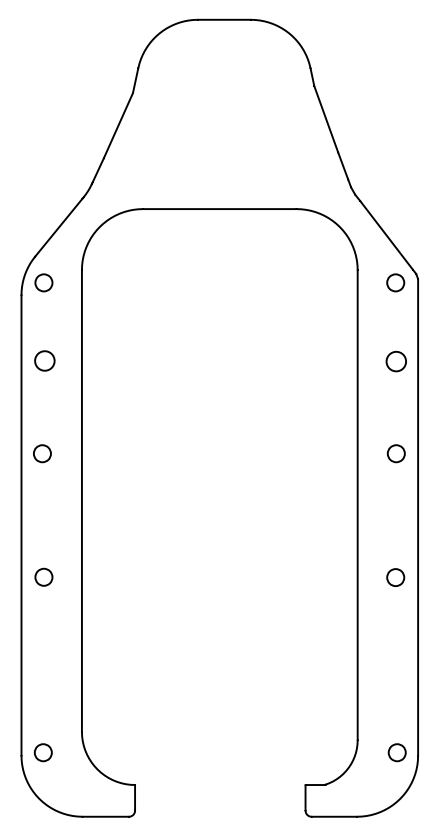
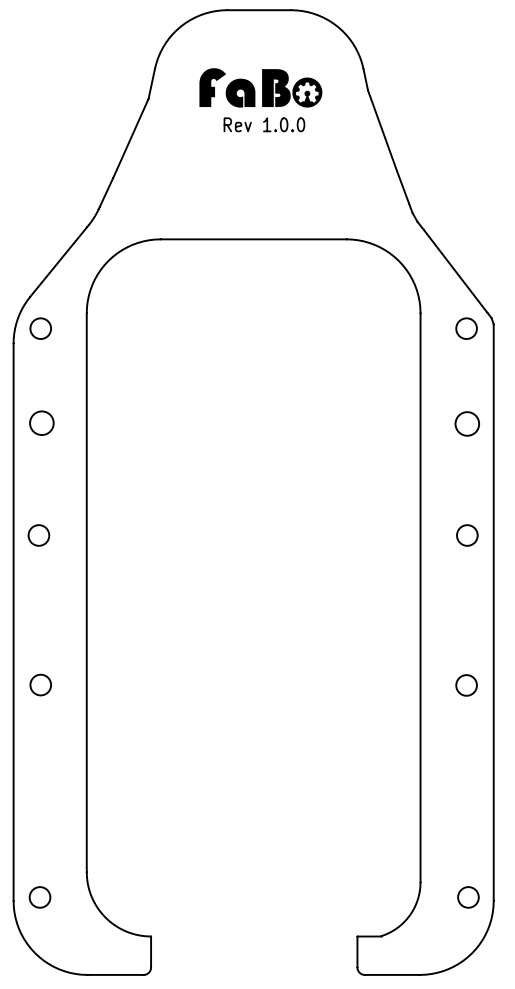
drawing: none -> [199, 68, 323, 108]
text: none -> Rev 1.0.0 (264, 124)

